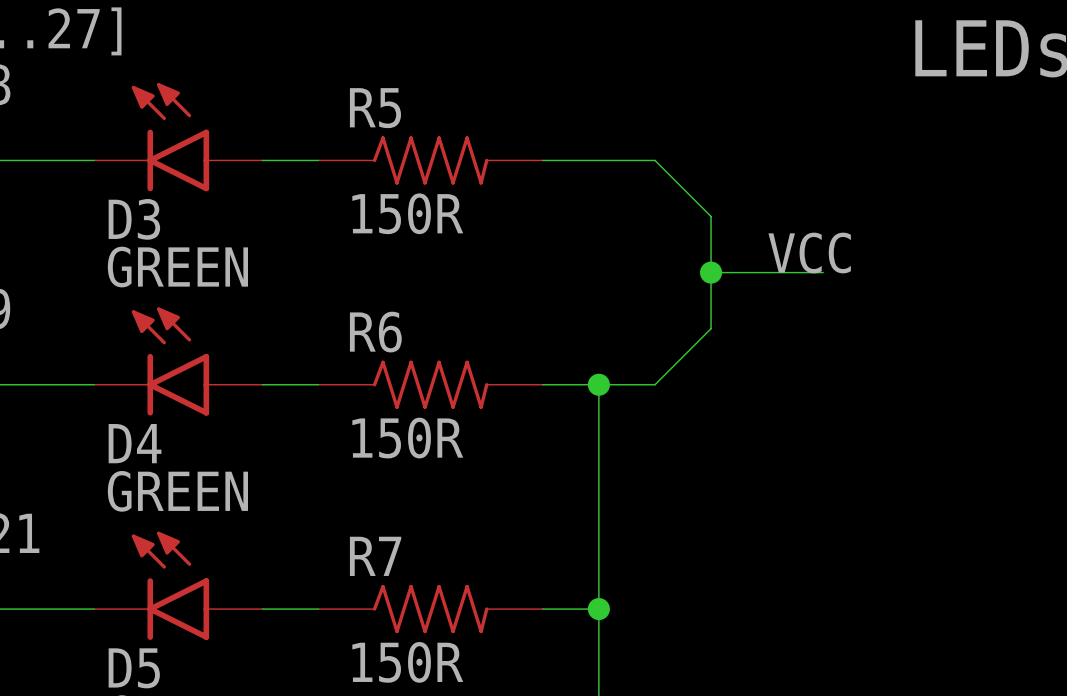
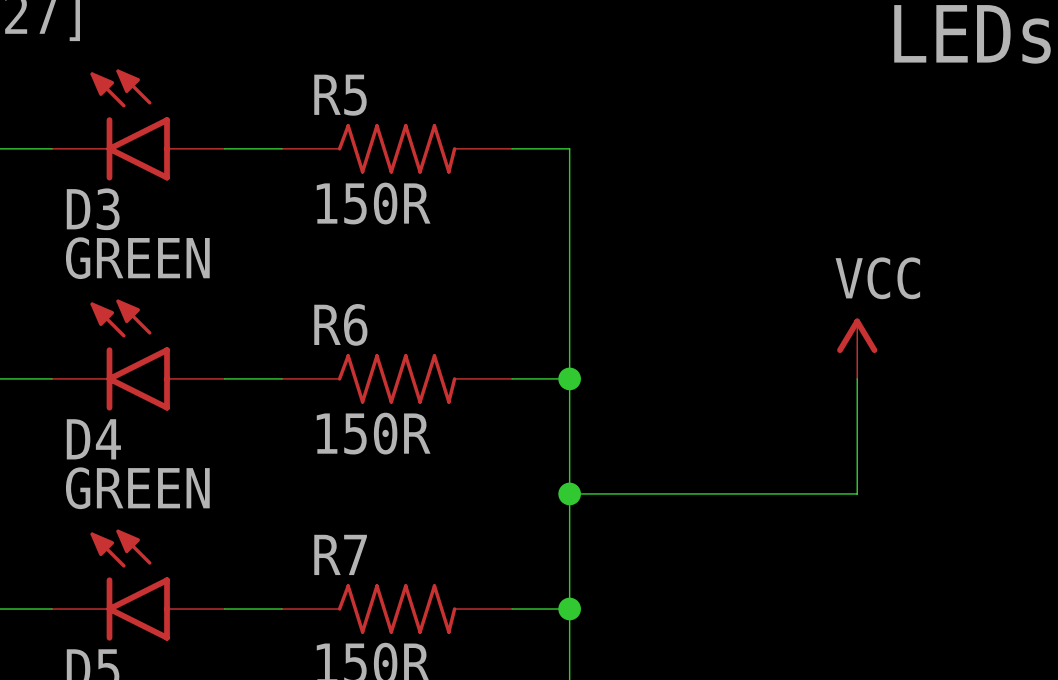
wire: (598, 160) (654, 160) (711, 216) (711, 328) (654, 384) (598, 384) -> (569, 148) (569, 378)
label: VCC (809, 253) -> none
wire: (711, 272) (823, 272) -> none
junction: (711, 272) -> none
power symbol: none -> VCC (857, 348)
wire: none -> (857, 378) (857, 493) (569, 493)
junction: none -> (569, 493)

